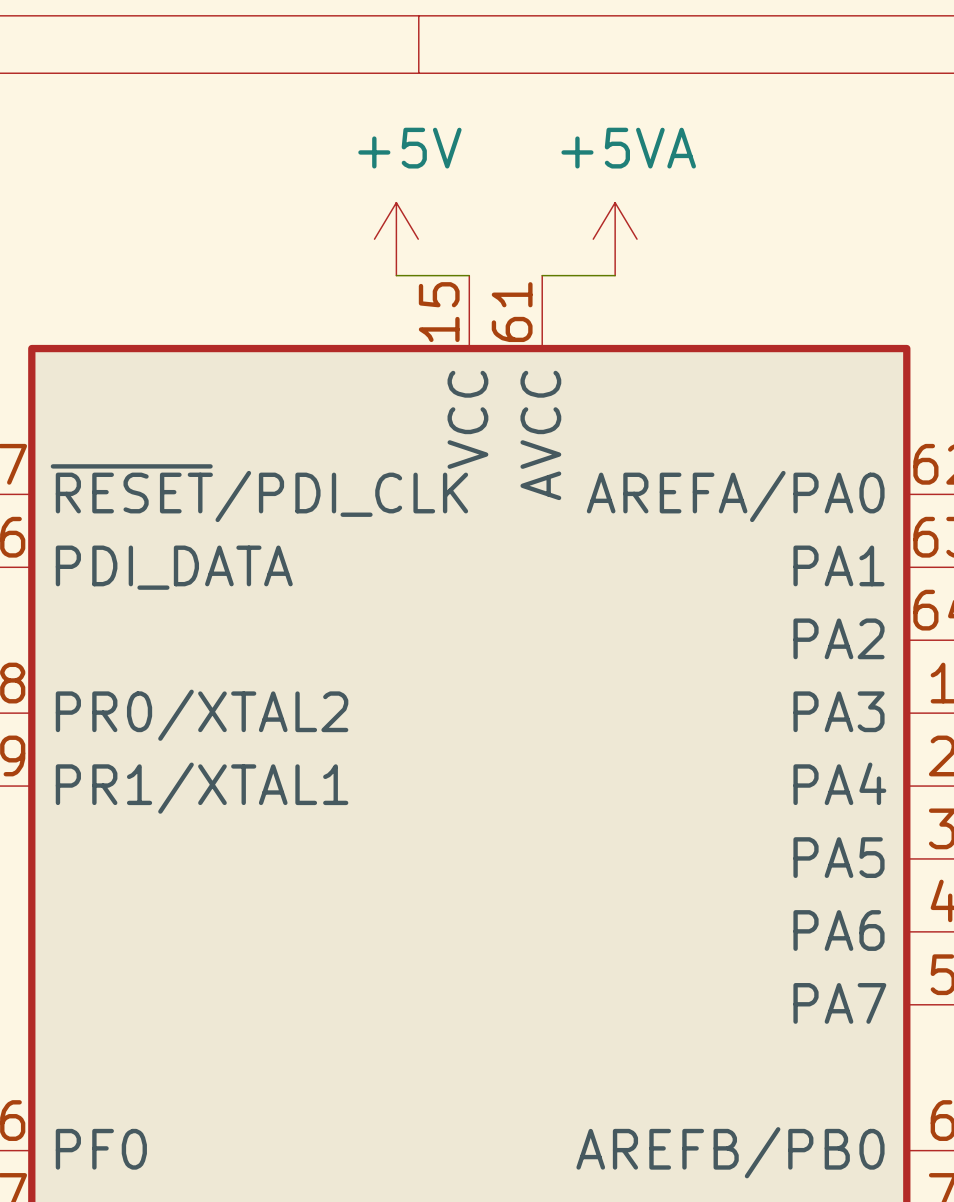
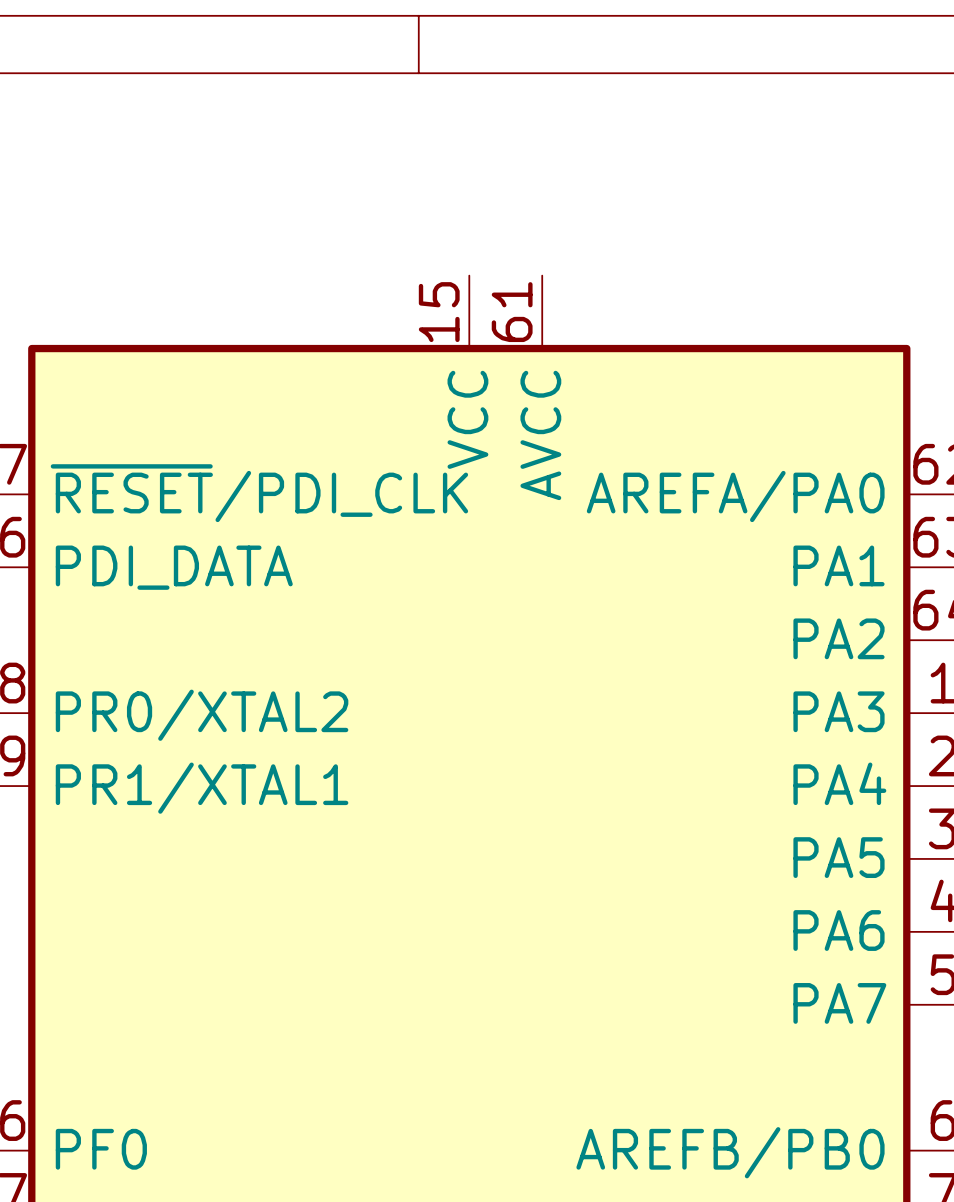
power symbol: +5V (396, 239) -> none
power symbol: +5VA (615, 239) -> none
wire: (396, 275) (469, 275) -> none
wire: (542, 275) (615, 275) -> none

